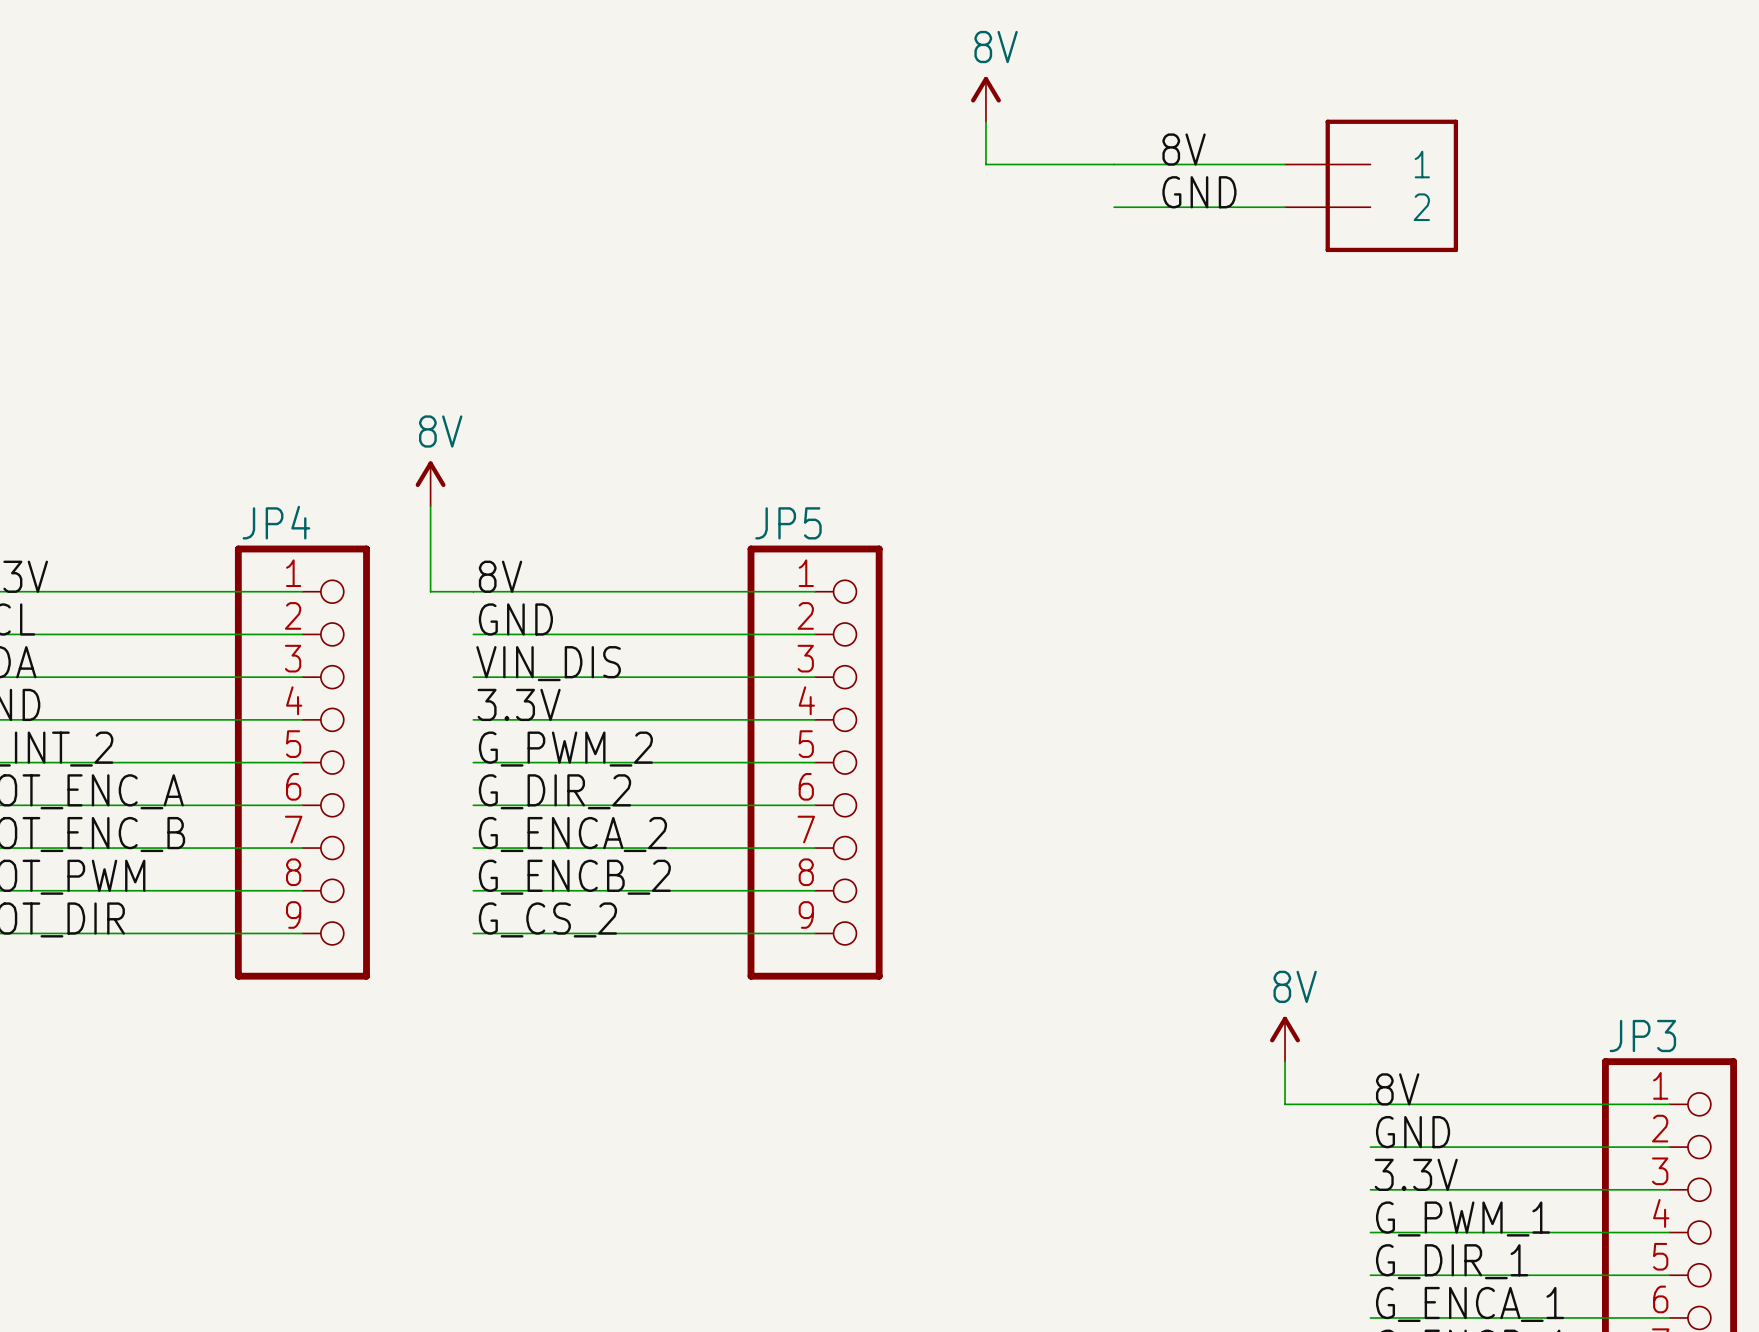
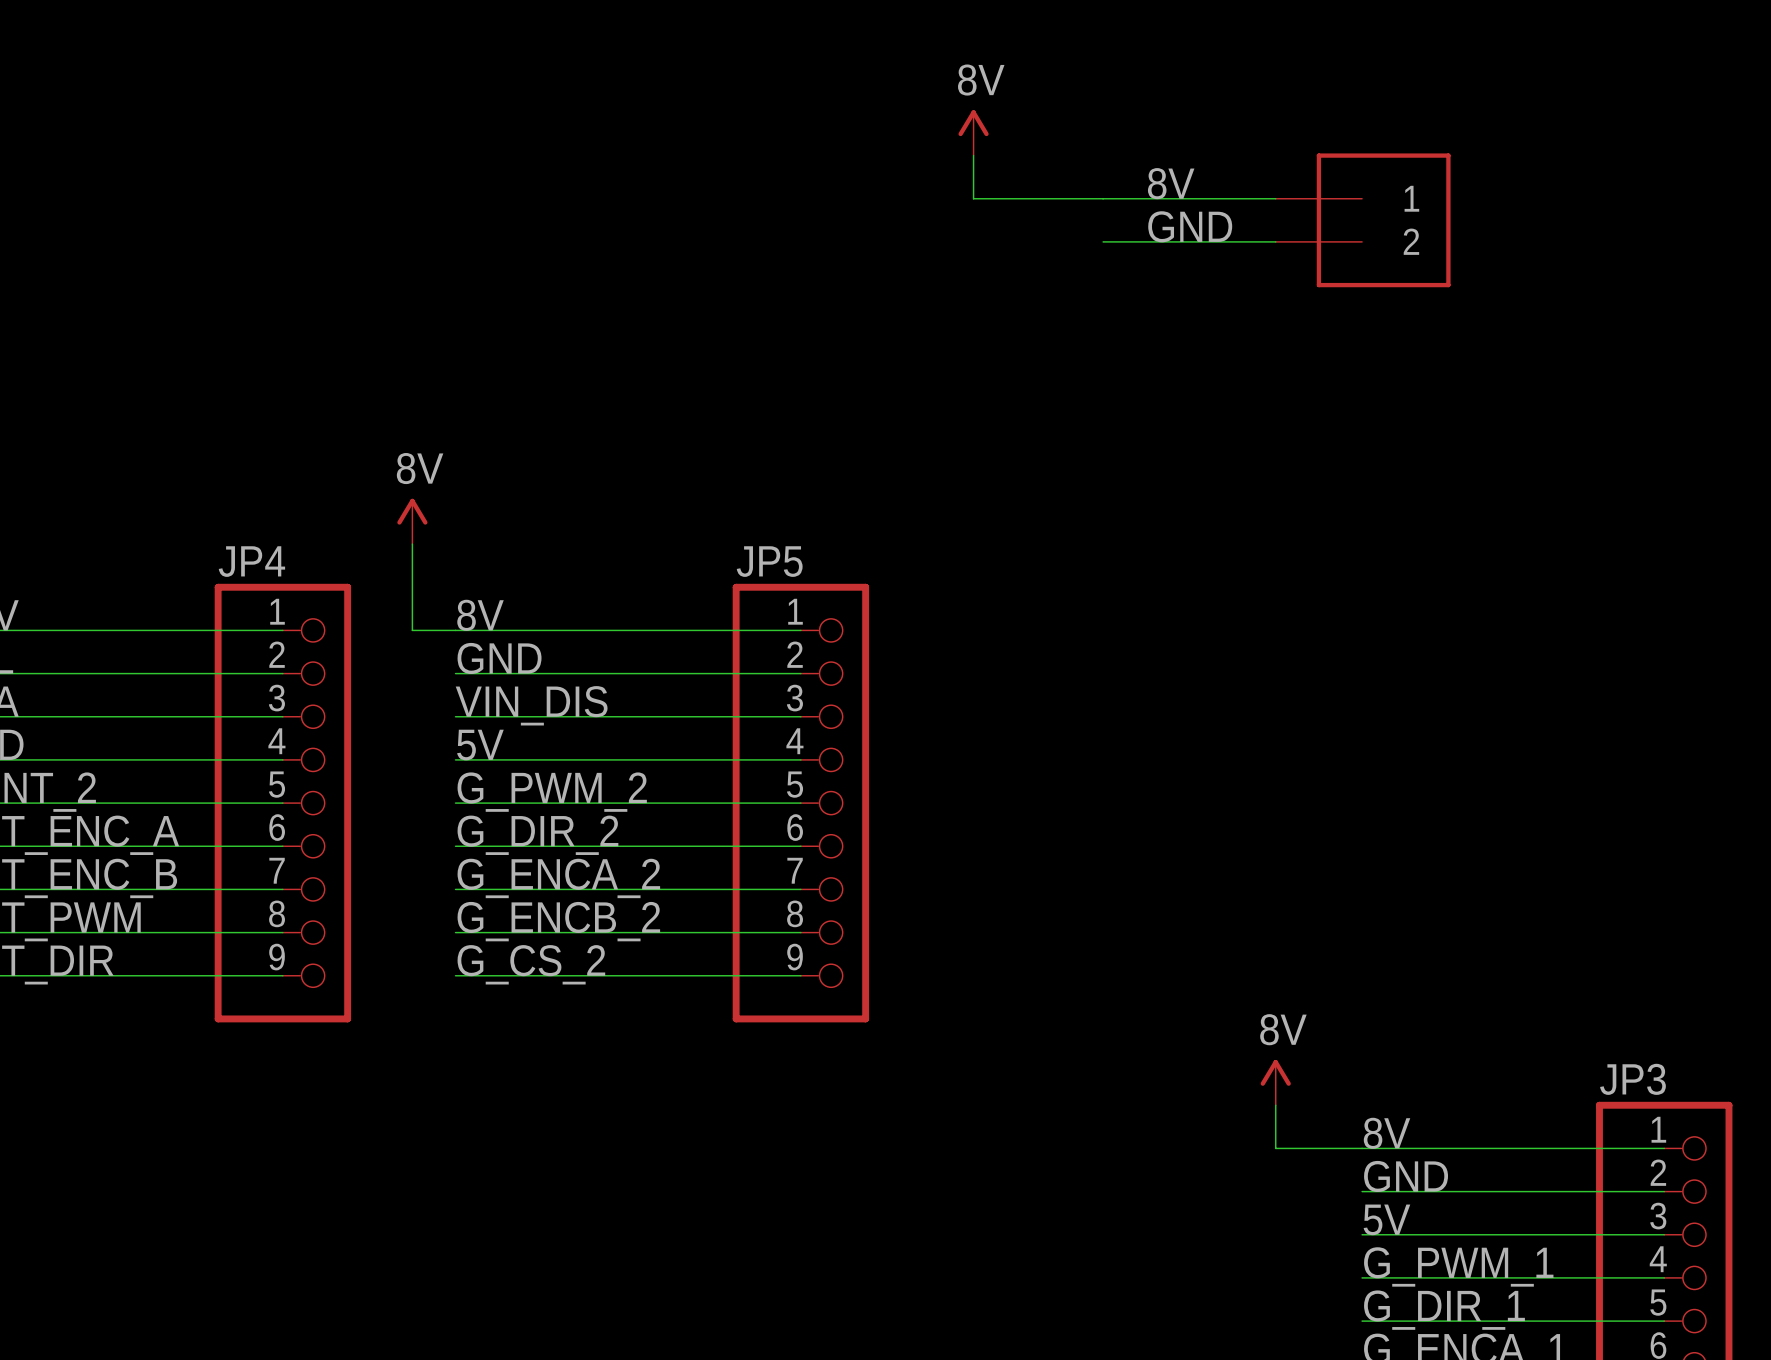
label: 3.3V (519, 704) -> 5V (480, 745)
label: 3.3V (1416, 1174) -> 5V (1386, 1219)

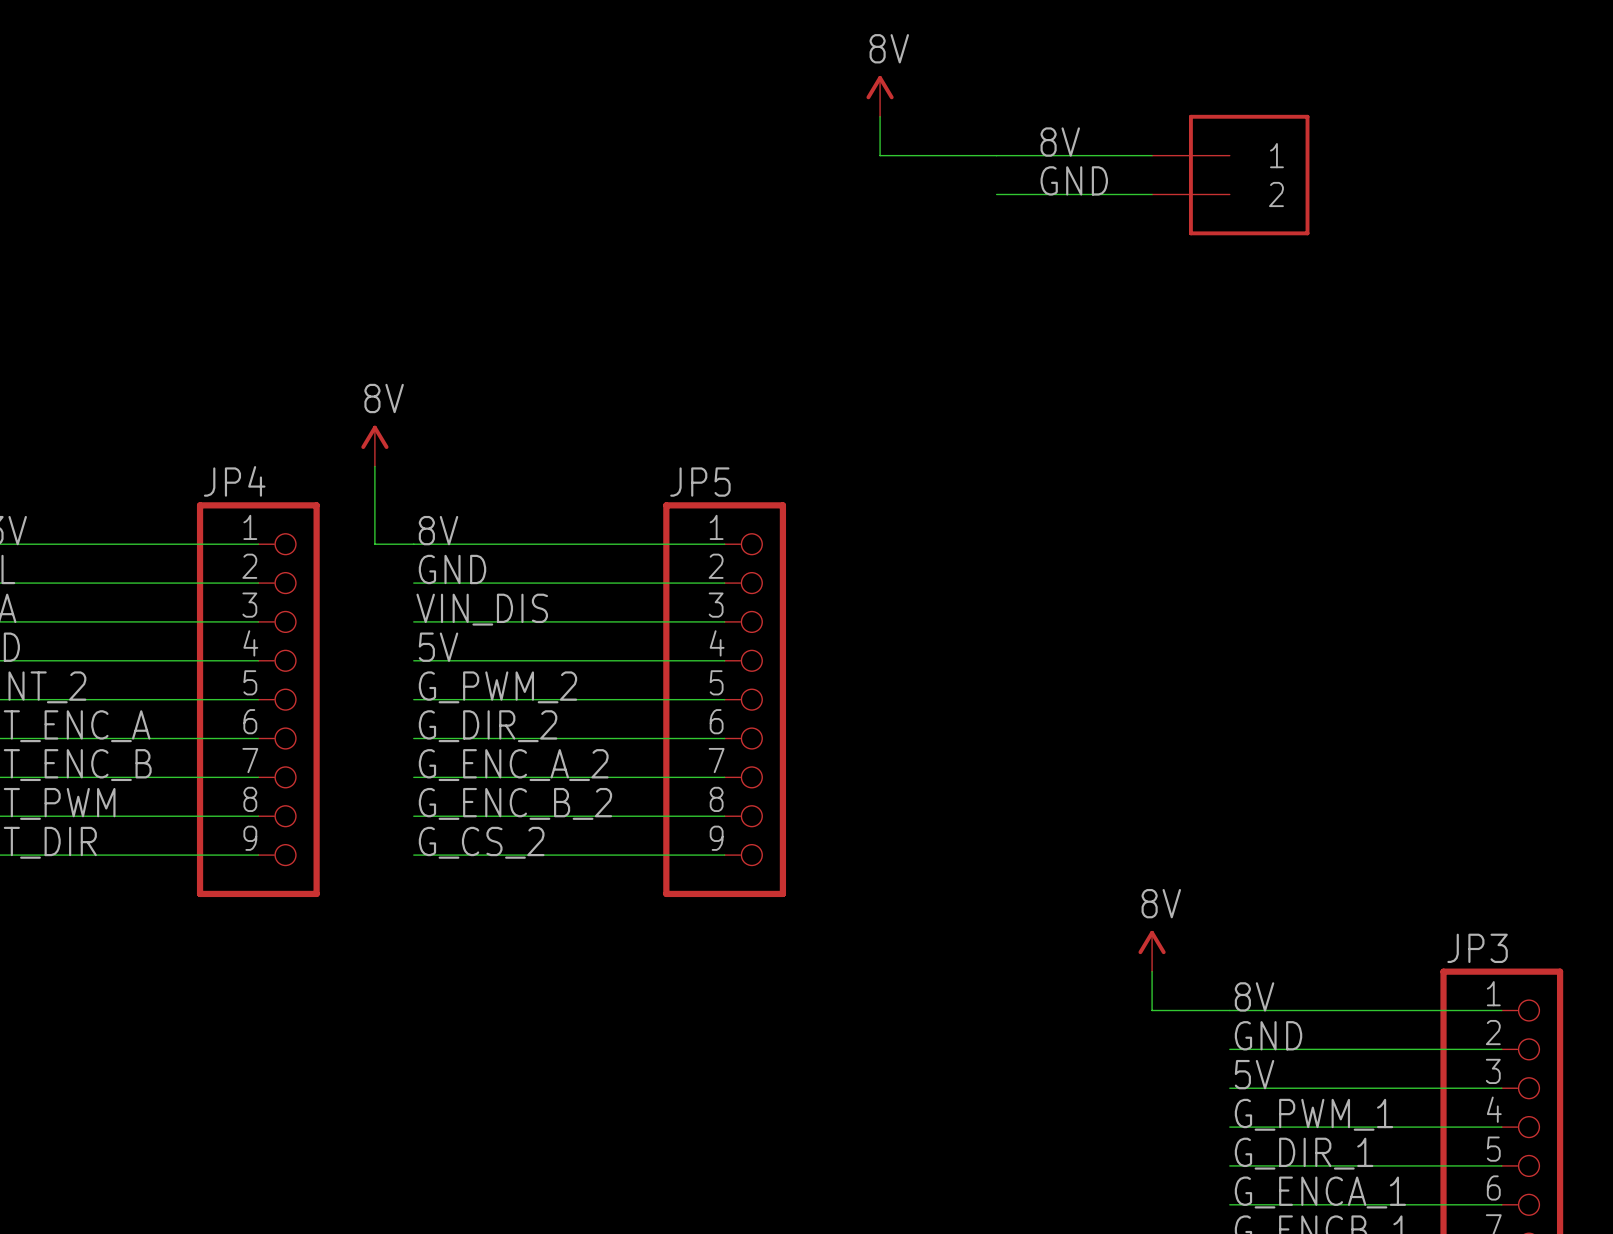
label: G_ENCA_2 (558, 878) -> G_ENC_A_2 (513, 765)
label: G_ENCB_2 (558, 921) -> G_ENC_B_2 (515, 803)

